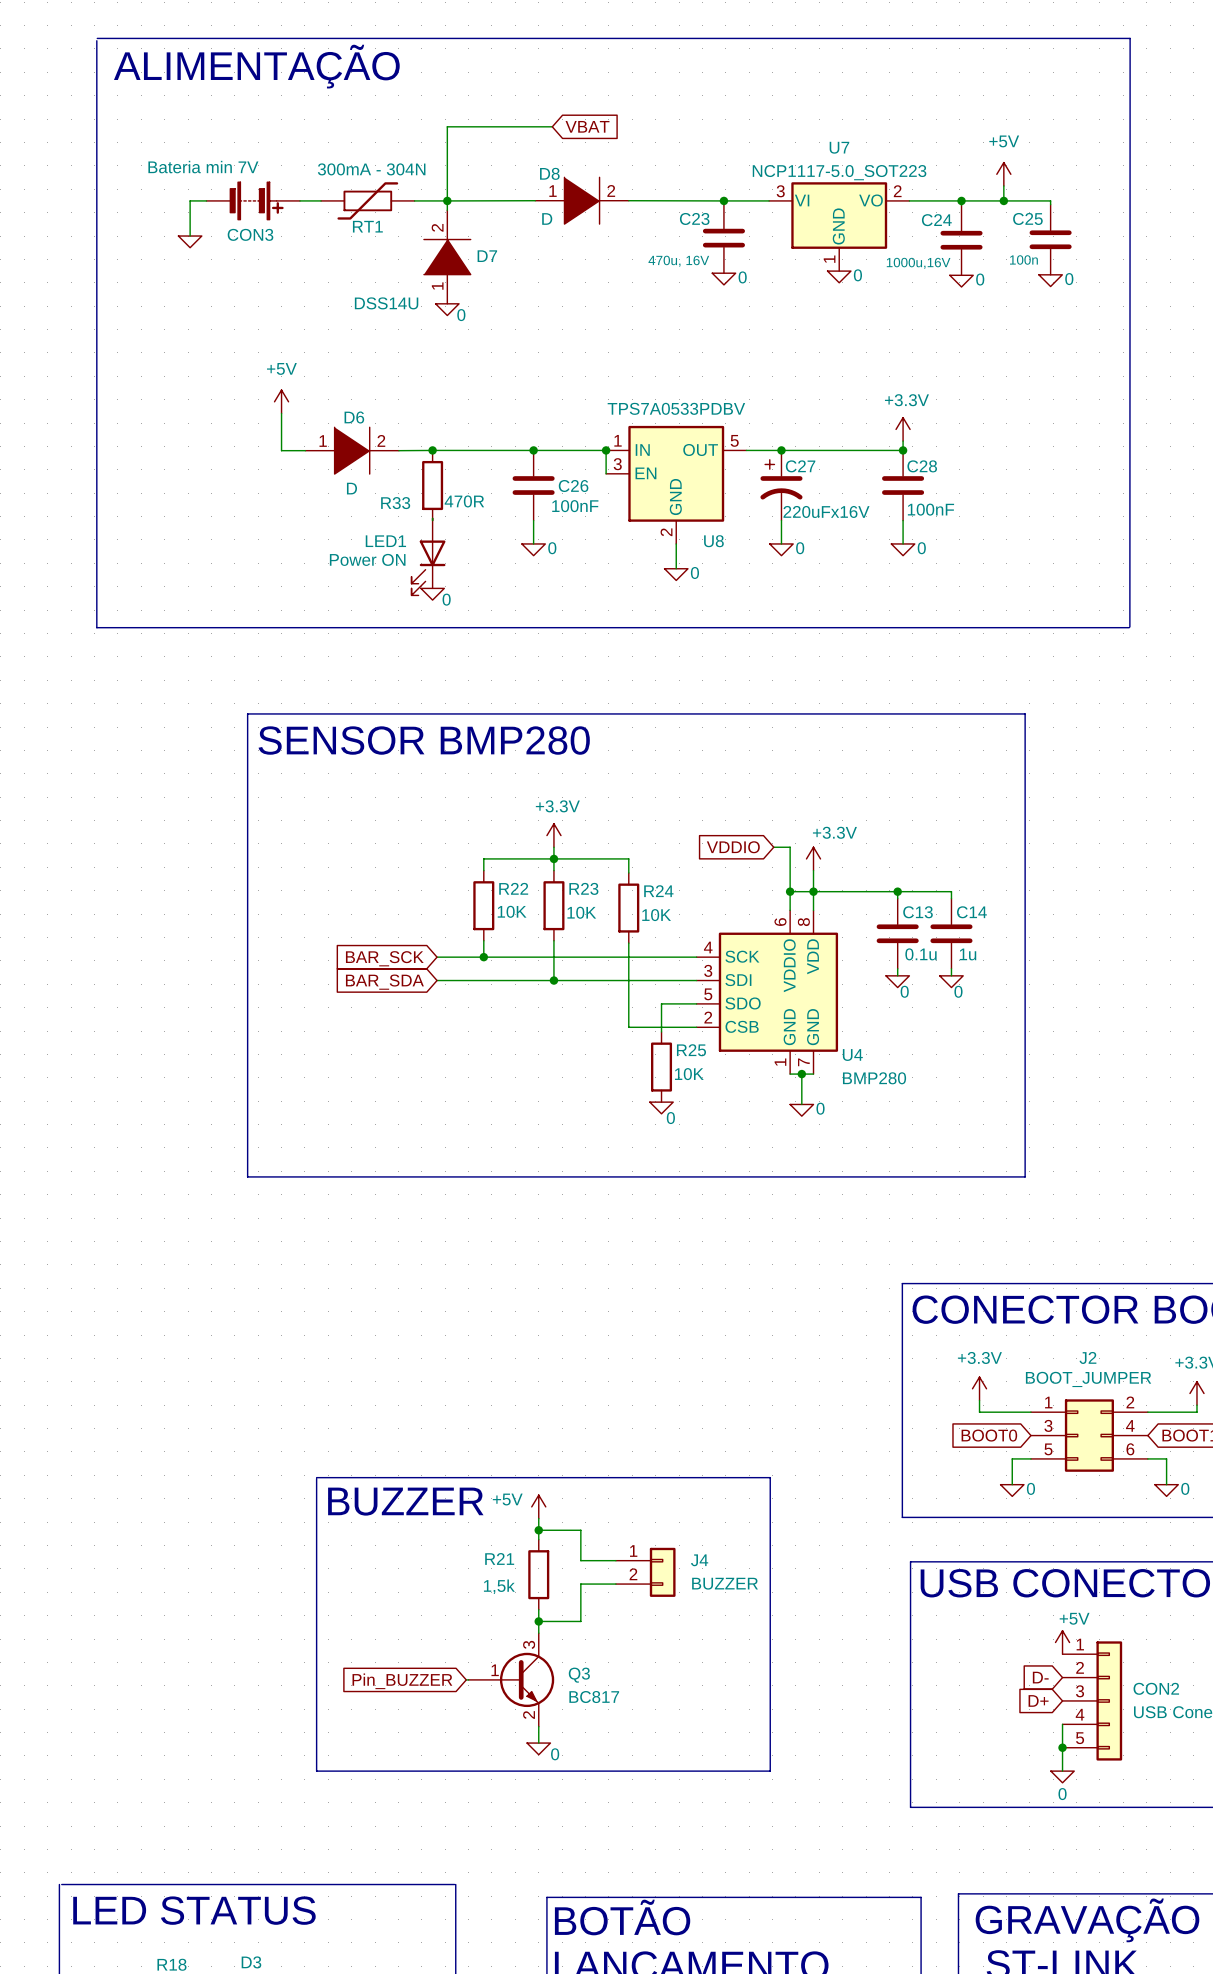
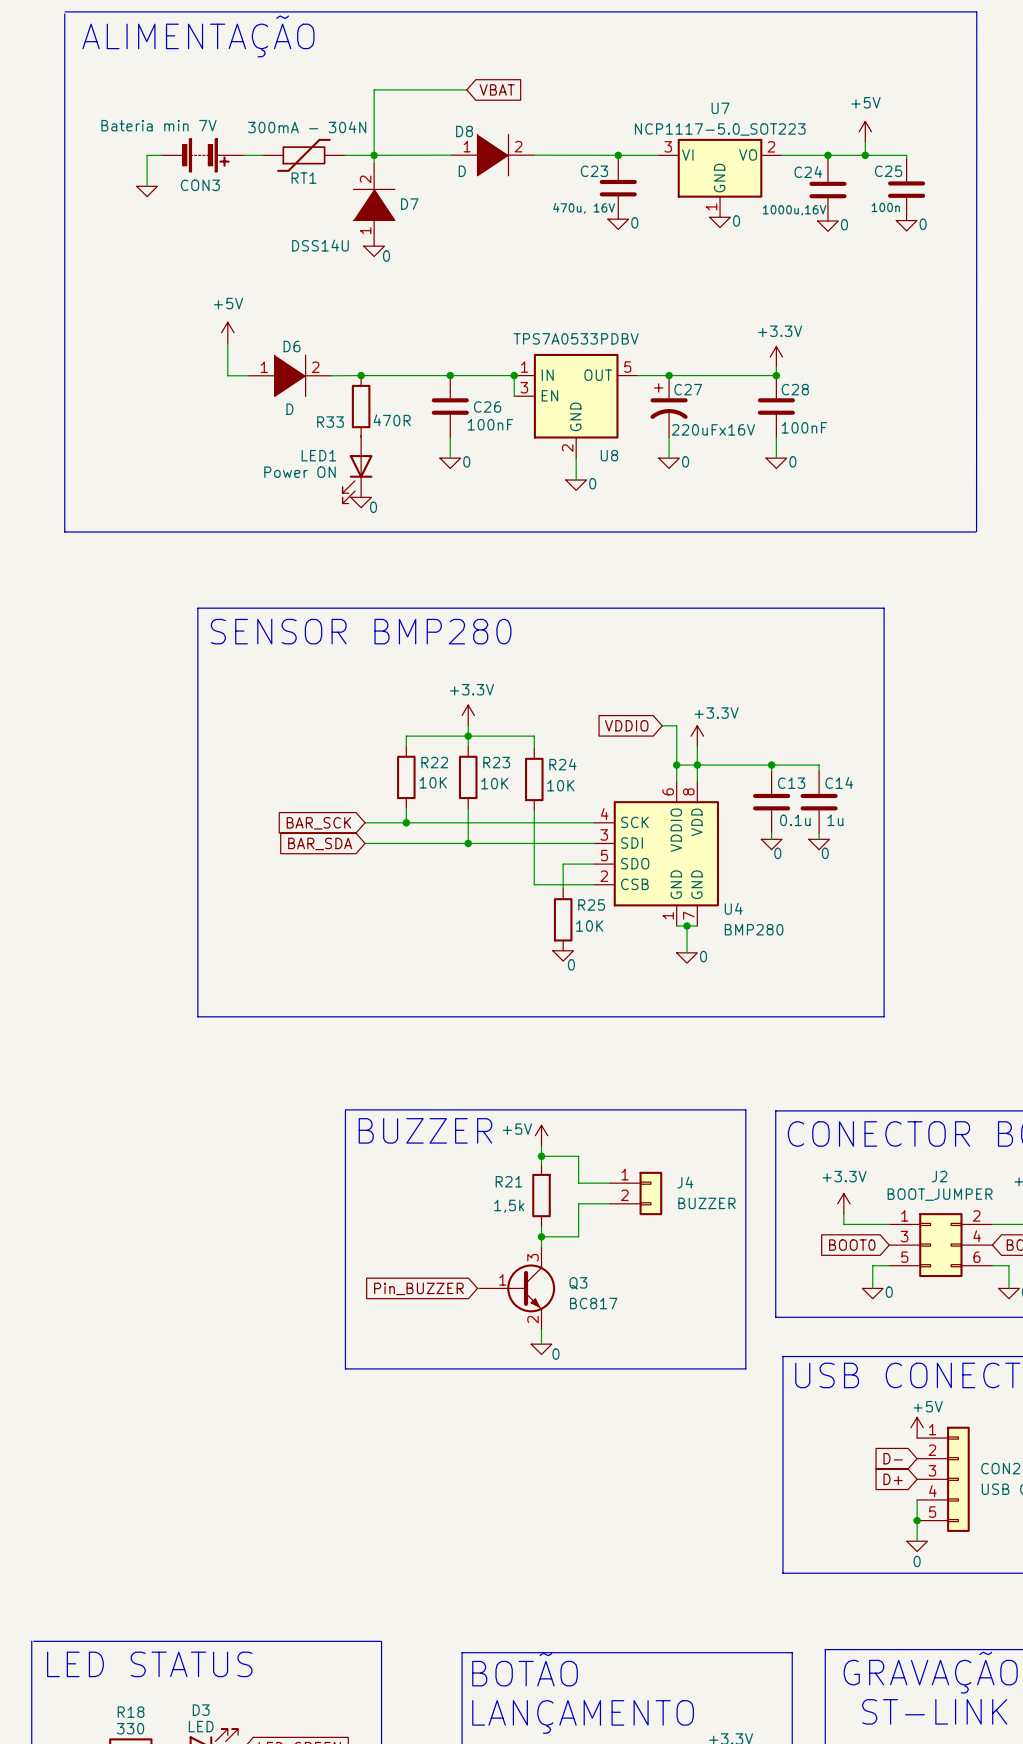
junction: none -> (541, 1156)
junction: none -> (541, 1236)
line: (316, 1477) (770, 1477) (770, 1771) (316, 1771) (316, 1478) -> (345, 1109) (745, 1109) (745, 1368) (345, 1368) (345, 1110)
text position: BUZZER (405, 1501) -> BUZZER (425, 1130)
power symbol position: +5V (538, 1506) -> +5V (541, 1135)
wire: (538, 1518) (538, 1539) -> (541, 1146) (541, 1164)
wire: (538, 1530) (580, 1530) (580, 1560) (615, 1560) -> (541, 1156) (578, 1156) (578, 1183) (609, 1183)
junction: (538, 1530) -> none
J4 position: (645, 1572) -> (635, 1193)
R21 position: (538, 1574) -> (541, 1195)
wire: (615, 1584) (580, 1584) (580, 1621) (538, 1621) -> (609, 1203) (578, 1203) (578, 1236) (541, 1236)
wire: (538, 1609) (538, 1633) -> (541, 1226) (541, 1247)
junction: (538, 1621) -> none
wire: (466, 1679) (468, 1679) -> (477, 1288) (479, 1288)
Q3 position: (511, 1679) -> (517, 1288)
global label position: Pin_BUZZER (402, 1681) -> Pin_BUZZER (418, 1288)
wire: (538, 1726) (538, 1743) -> (541, 1329) (541, 1344)
power symbol position: 0 (538, 1748) -> 0 (541, 1349)

